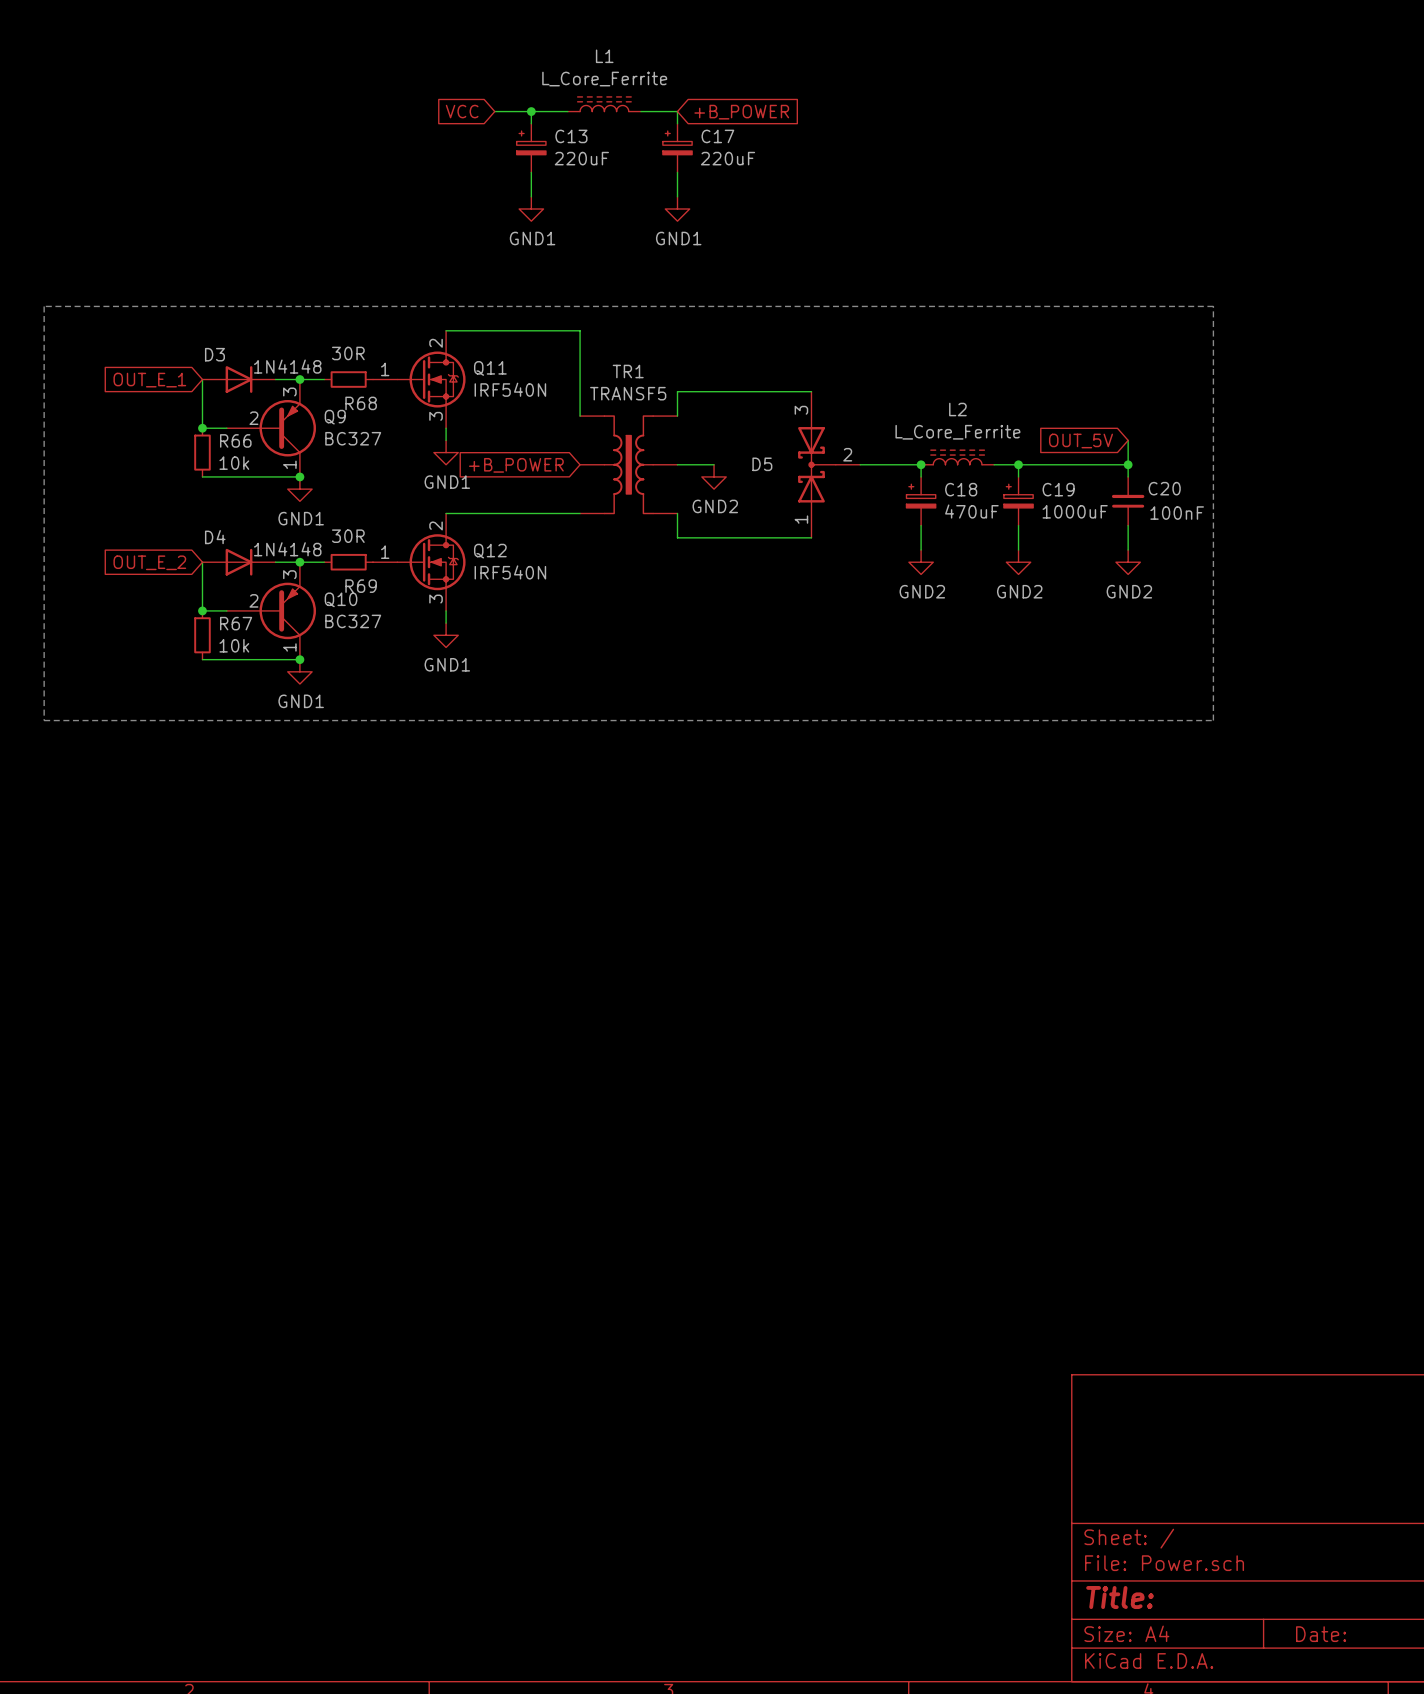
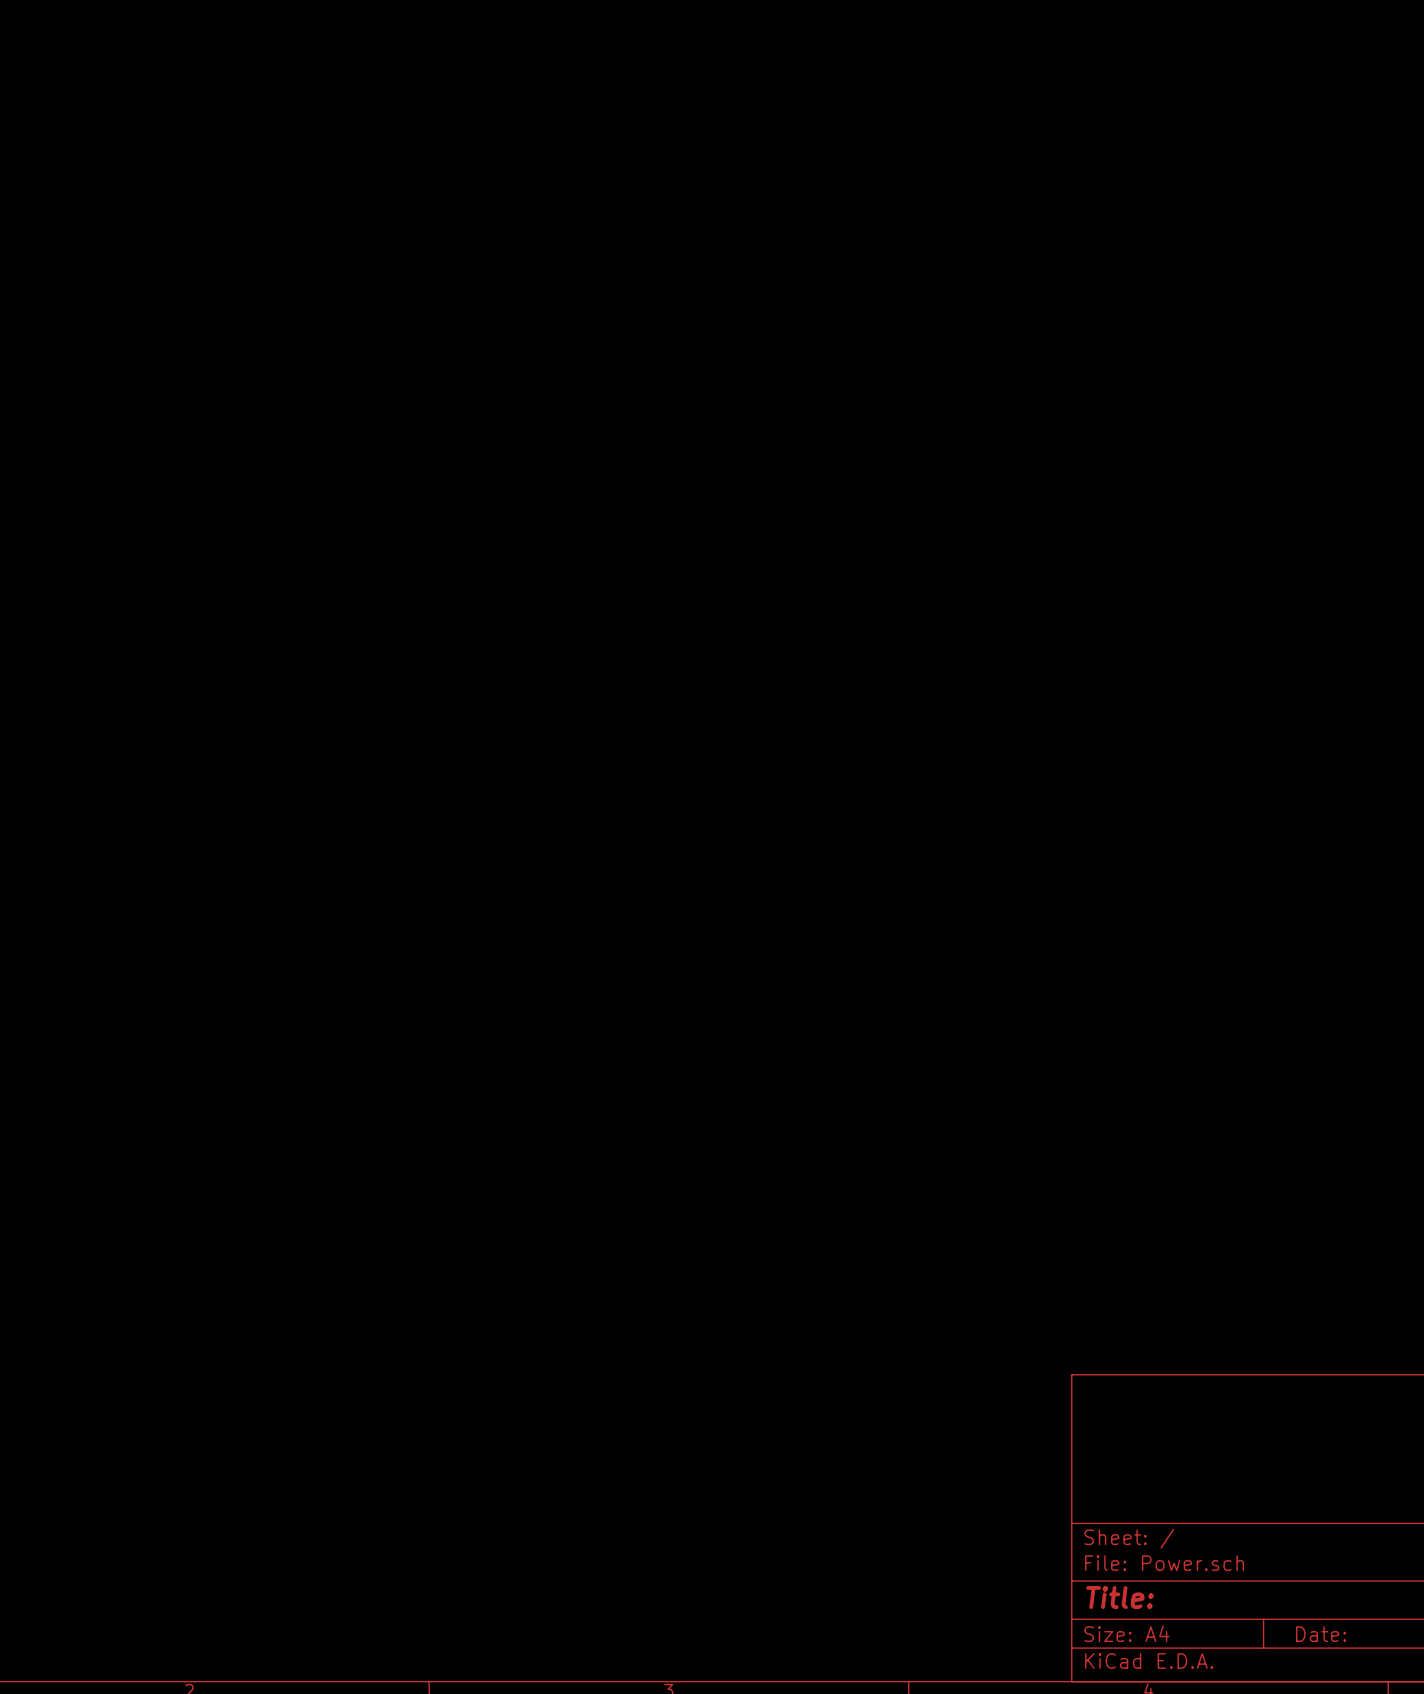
L1: L_Core_Ferrite (604, 104) -> none
global label: VCC (462, 111) -> none
wire: (494, 111) (567, 111) -> none
wire: (531, 111) (531, 123) -> none
junction: (531, 111) -> none
wire: (640, 111) (677, 111) (677, 123) -> none
global label: +B_POWER (741, 112) -> none
C13: 220uF (531, 148) -> none
C17: 220uF (677, 148) -> none
wire: (531, 172) (531, 196) -> none
wire: (677, 172) (677, 196) -> none
power symbol: GND1 (531, 209) -> none
power symbol: GND1 (677, 209) -> none
line: (44, 306) (44, 720) (1213, 720) (1213, 306) (44, 306) -> none
wire: (446, 330) (580, 330) (580, 416) -> none
wire: (202, 379) (202, 428) (226, 428) -> none
D3: 1N4148 (239, 379) -> none
wire: (275, 379) (324, 379) -> none
junction: (299, 379) -> none
R68: 30R (348, 379) -> none
Q11: IRF540N (419, 379) -> none
global label: OUT_E_1 (149, 380) -> none
wire: (811, 391) (677, 391) (677, 416) -> none
junction: (202, 428) -> none
Q9: BC327 (271, 428) -> none
wire: (446, 428) (446, 440) -> none
global label: OUT_5V (1081, 440) -> none
wire: (1128, 440) (1128, 476) -> none
R66: 10k (202, 452) -> none
power symbol: GND1 (446, 452) -> none
L2: L_Core_Ferrite (957, 457) -> none
TR1: TRANSF5 (628, 464) -> none
wire: (677, 464) (714, 464) -> none
D5: (829, 464) -> none
wire: (860, 464) (921, 464) (921, 476) -> none
junction: (921, 464) -> none
wire: (994, 464) (1128, 464) -> none
wire: (1018, 464) (1018, 476) -> none
junction: (1018, 464) -> none
junction: (1128, 464) -> none
global label: +B_POWER (516, 465) -> none
wire: (202, 476) (299, 476) -> none
junction: (299, 476) -> none
power symbol: GND2 (714, 476) -> none
power symbol: GND1 (299, 489) -> none
C18: 470uF (921, 501) -> none
C19: 1000uF (1018, 501) -> none
C20: 100nF (1128, 501) -> none
wire: (446, 513) (580, 513) -> none
wire: (677, 513) (677, 537) (811, 537) -> none
wire: (921, 525) (921, 550) -> none
wire: (1018, 525) (1018, 550) -> none
wire: (1128, 525) (1128, 550) -> none
global label: OUT_E_2 (149, 562) -> none
wire: (202, 562) (202, 610) (226, 610) -> none
D4: 1N4148 (239, 562) -> none
wire: (275, 562) (324, 562) -> none
junction: (299, 562) -> none
R69: 30R (348, 562) -> none
Q12: IRF540N (419, 562) -> none
power symbol: GND2 (921, 562) -> none
power symbol: GND2 (1018, 562) -> none
power symbol: GND2 (1128, 562) -> none
junction: (202, 610) -> none
Q10: BC327 (271, 610) -> none
wire: (446, 610) (446, 623) -> none
R67: 10k (202, 635) -> none
power symbol: GND1 (446, 635) -> none
wire: (202, 659) (299, 659) -> none
junction: (299, 659) -> none
power symbol: GND1 (299, 671) -> none

